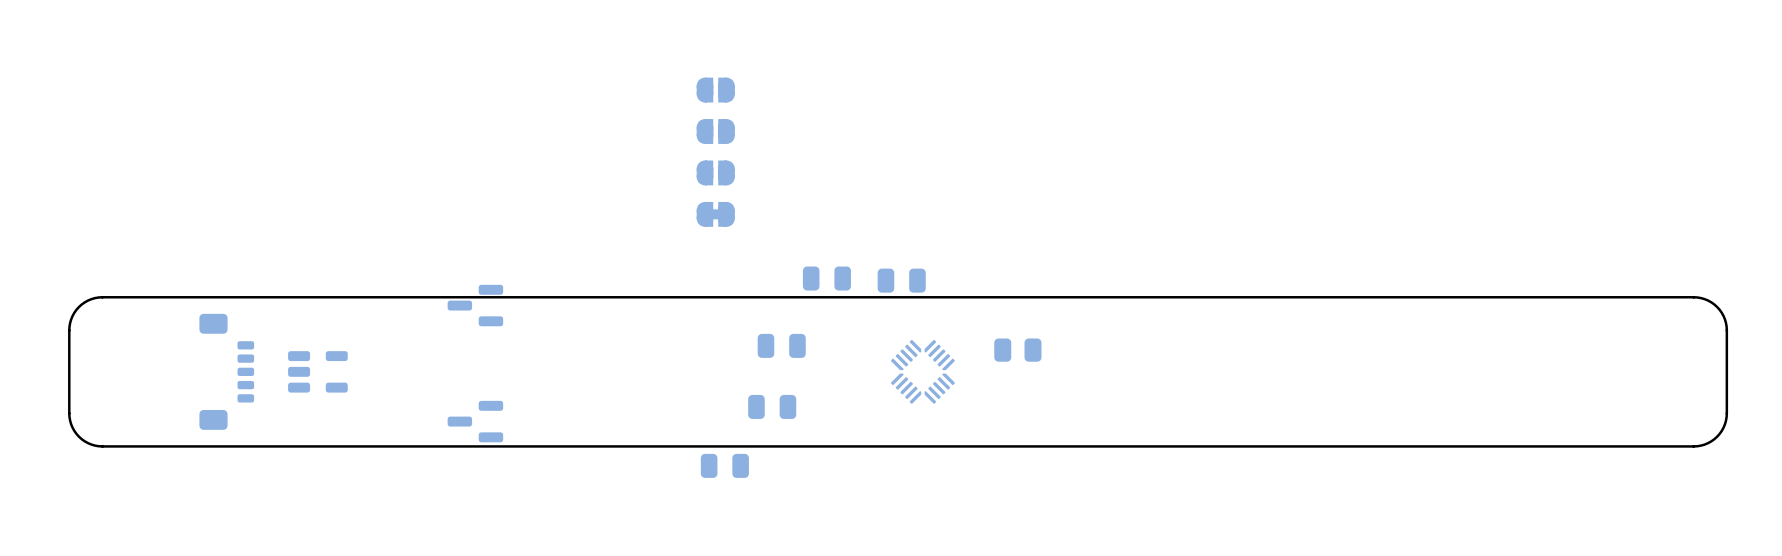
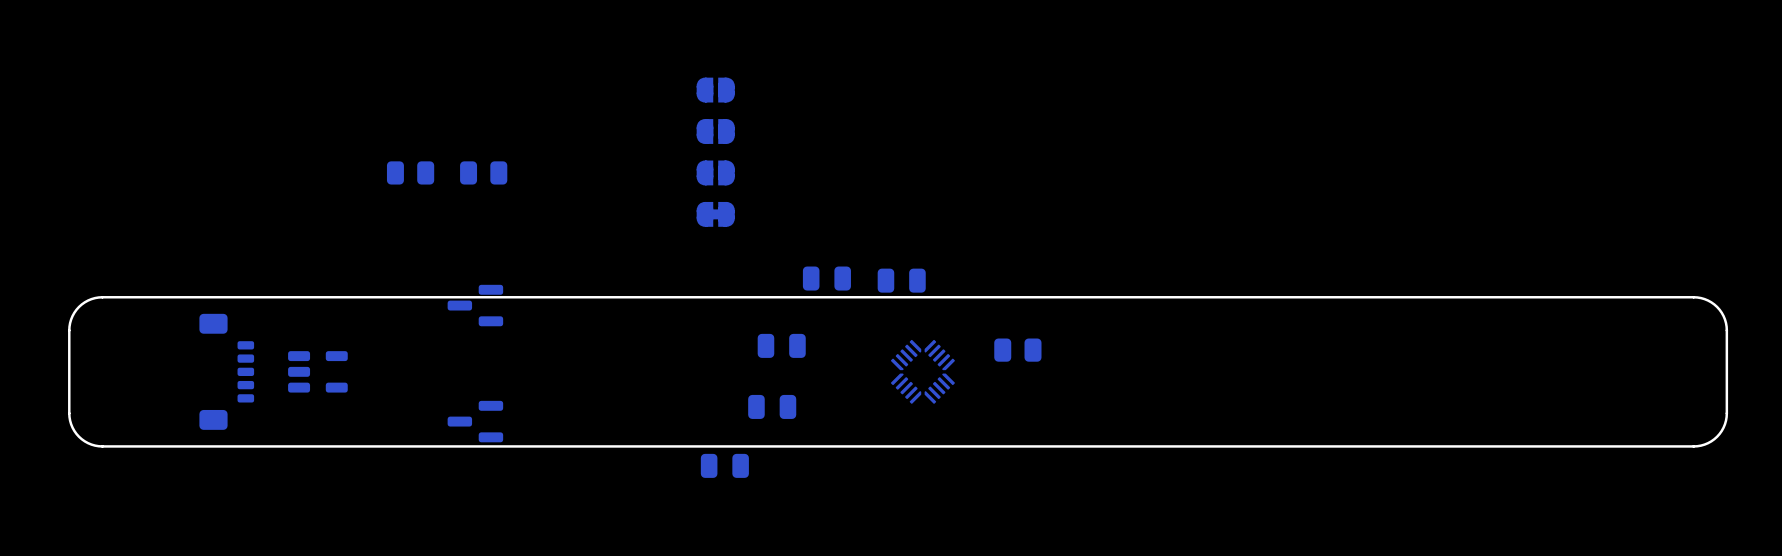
part: none -> (410, 172)
part: none -> (483, 172)

